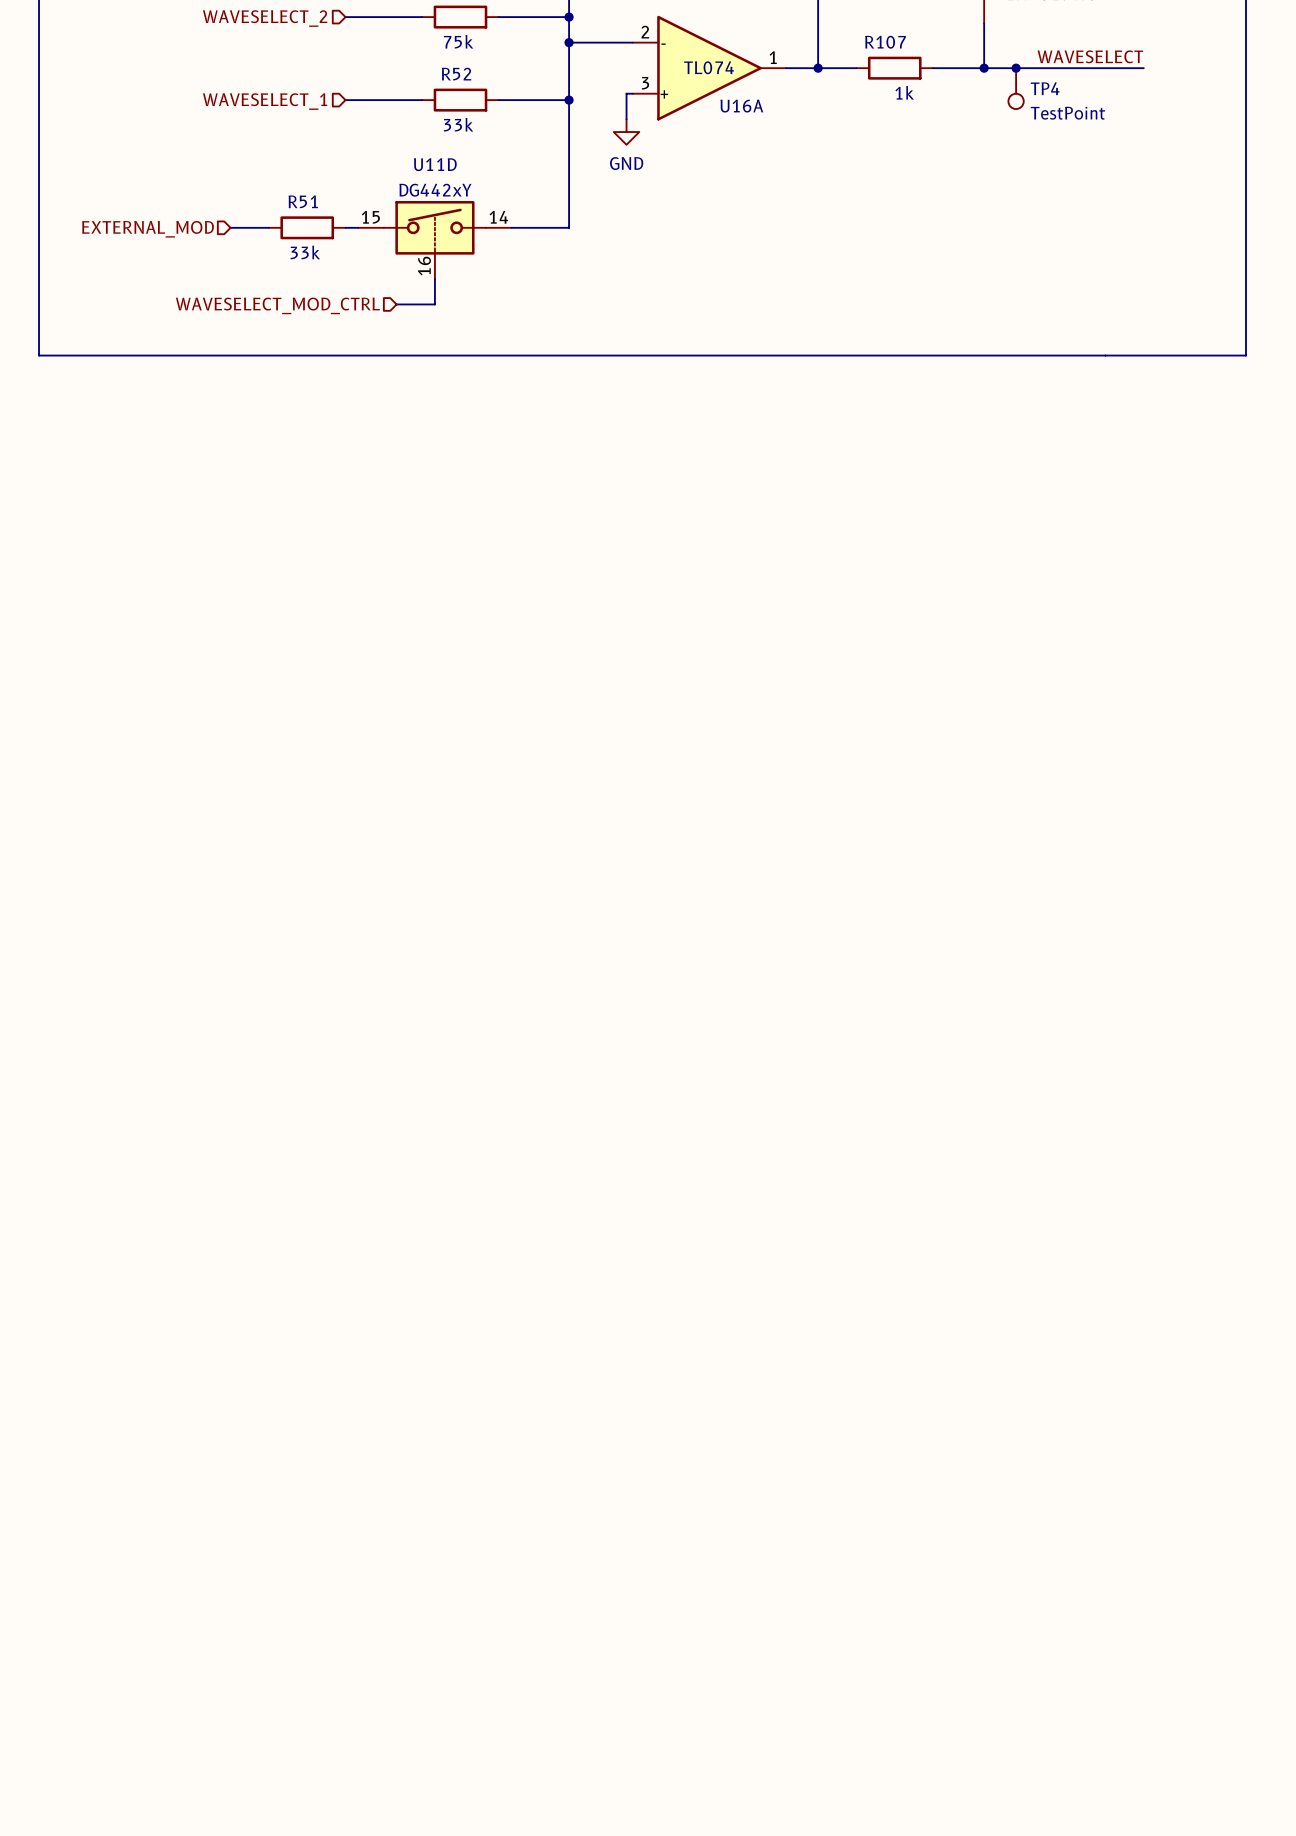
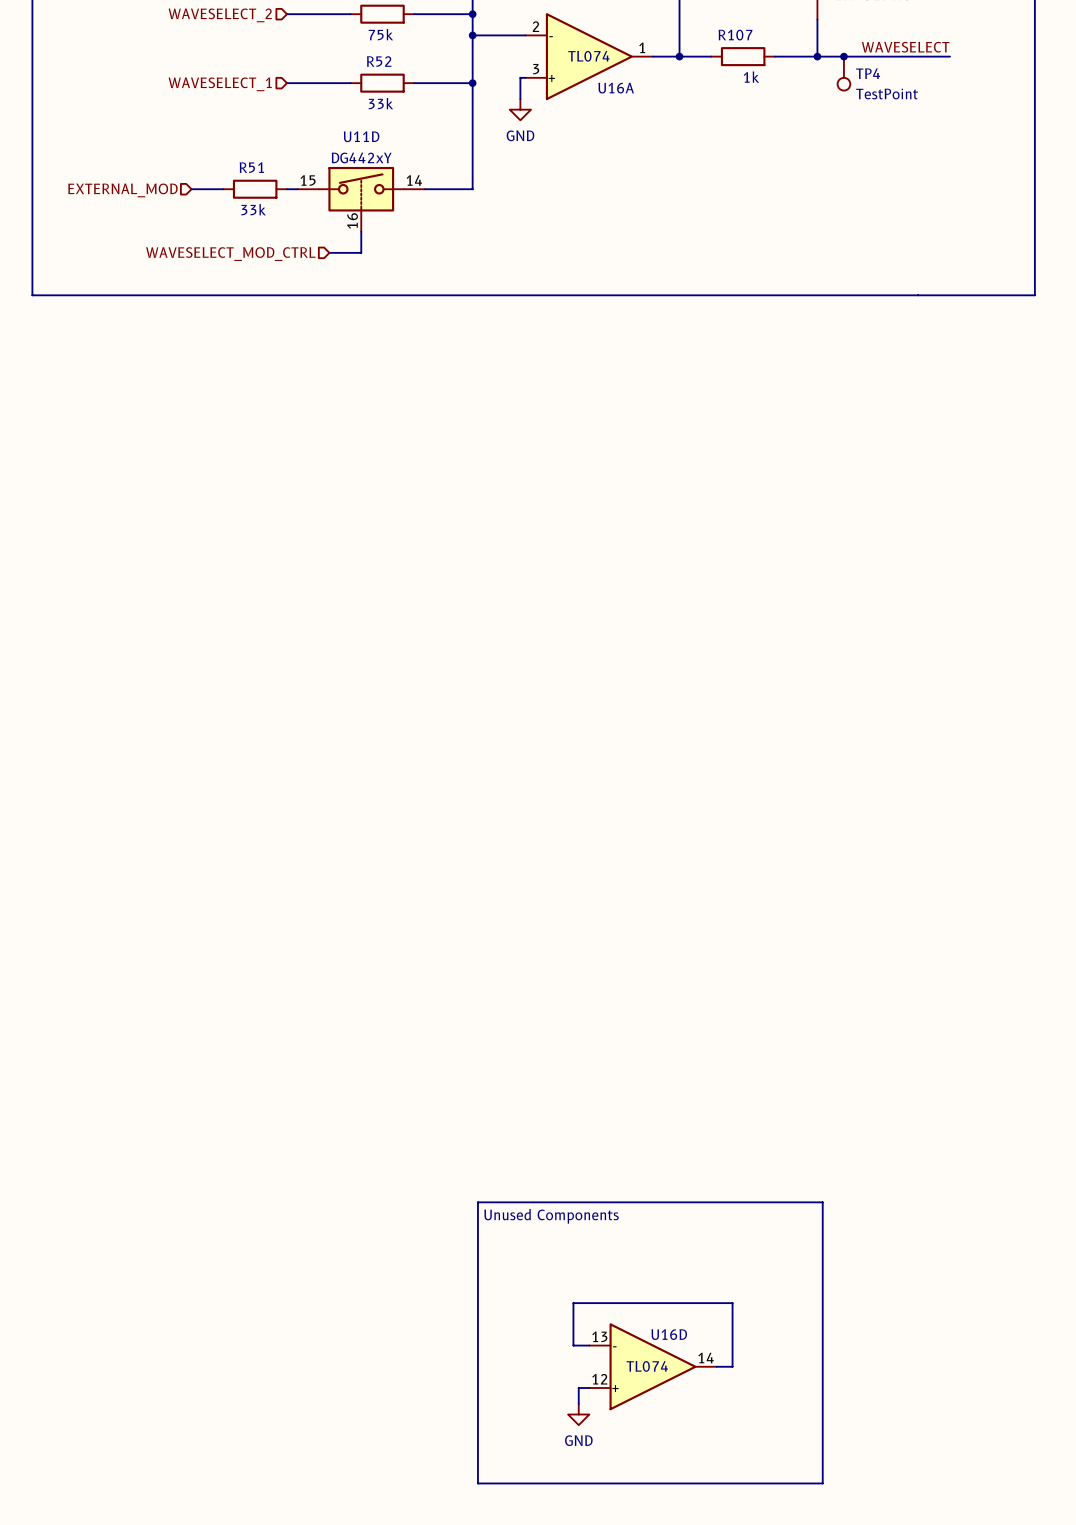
line: none -> (477, 1202) (822, 1202) (822, 1483) (477, 1483) (477, 1202)
text: none -> Unused Components (551, 1216)
wire: none -> (589, 1345) (573, 1345) (573, 1303) (732, 1303) (732, 1366) (716, 1366)
U16D: none -> TL074 (653, 1366)
wire: none -> (589, 1387) (578, 1387) (578, 1403)
power symbol: none -> GND (578, 1414)

